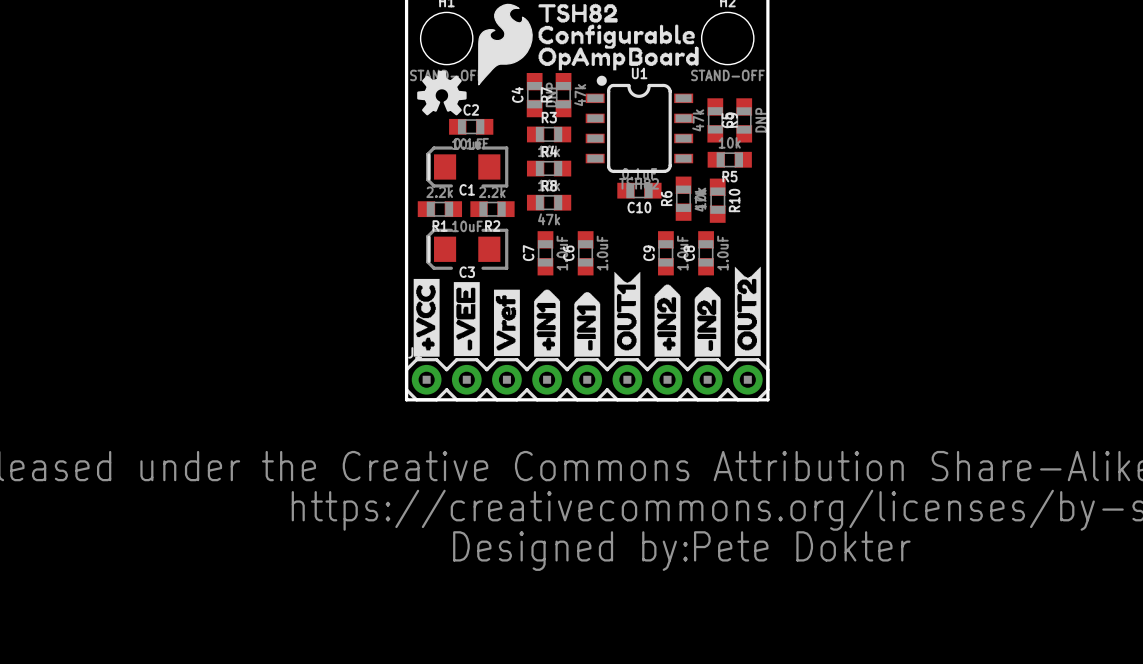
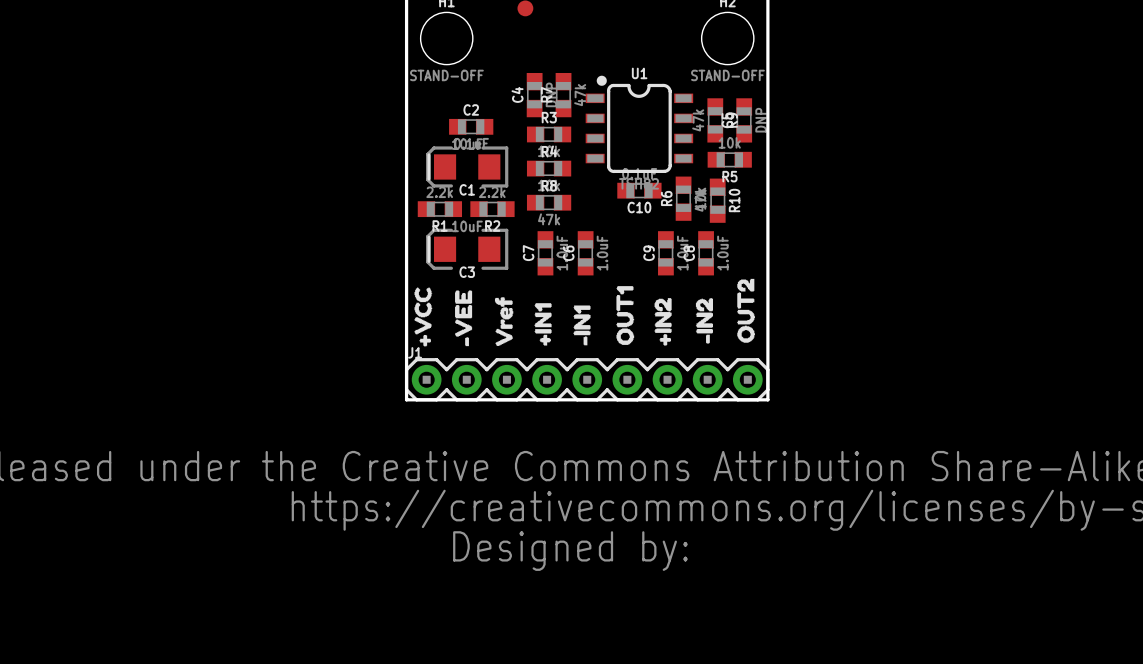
drawing: [417, 3, 699, 116] -> none
part: none -> (525, 8)
drawing shape: [734, 266, 761, 357] -> [737, 278, 755, 343]
drawing shape: [614, 271, 641, 357] -> [616, 286, 635, 345]
drawing shape: [413, 278, 440, 357] -> [414, 287, 433, 347]
drawing shape: [453, 282, 480, 357] -> [455, 290, 473, 347]
drawing shape: [654, 284, 681, 357] -> [654, 298, 672, 346]
drawing shape: [694, 287, 721, 357] -> [695, 298, 713, 344]
drawing shape: [493, 289, 520, 357] -> [494, 297, 514, 346]
drawing shape: [534, 289, 561, 357] -> [534, 303, 552, 346]
drawing shape: [574, 292, 601, 357] -> [573, 305, 591, 346]
text: Pete Dokter (802, 546) -> none

